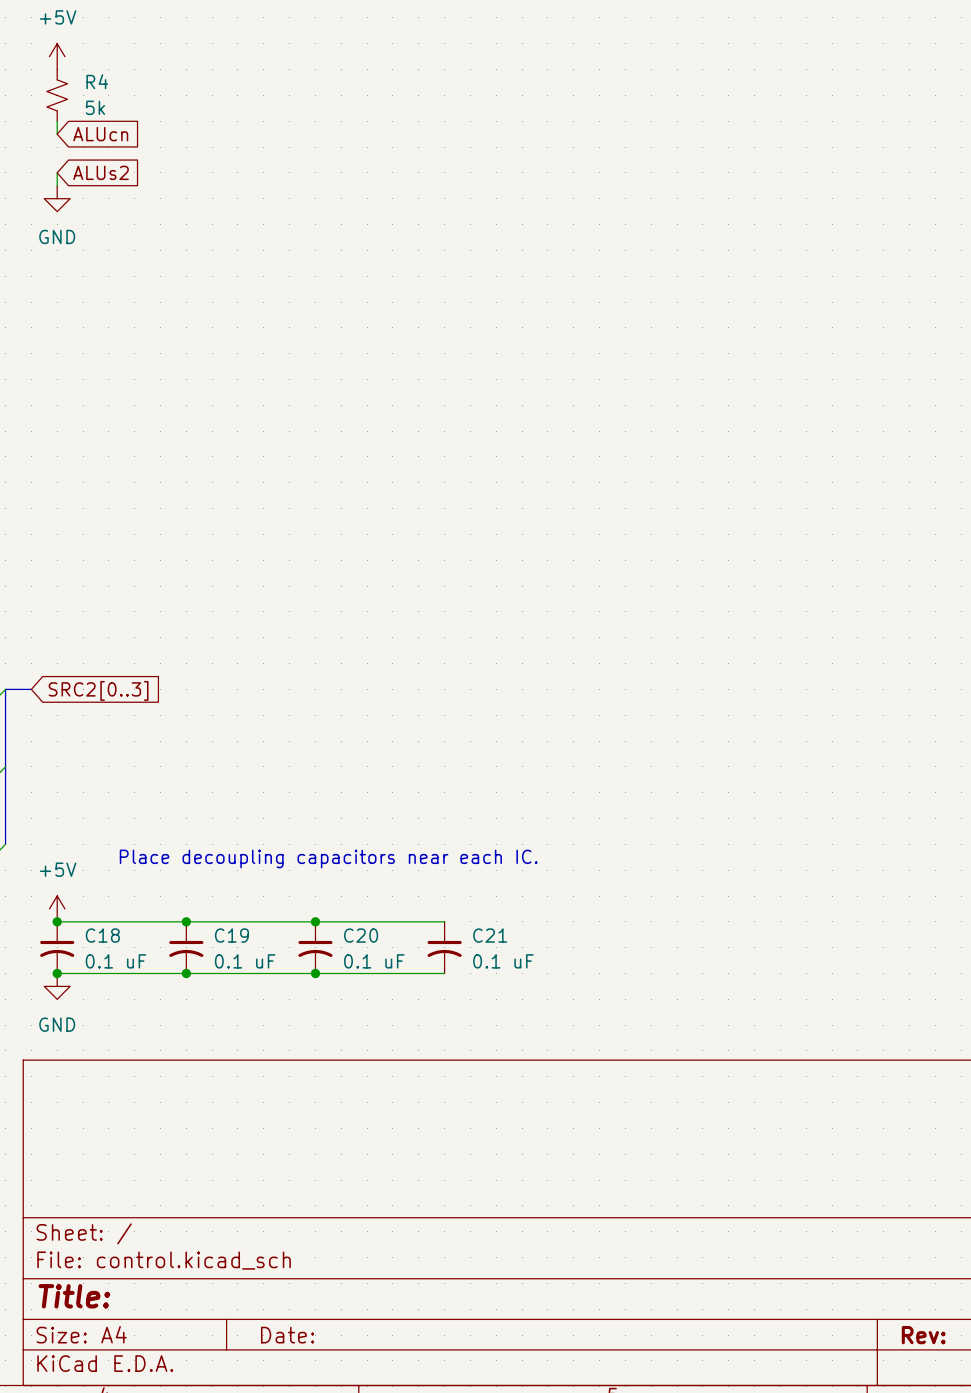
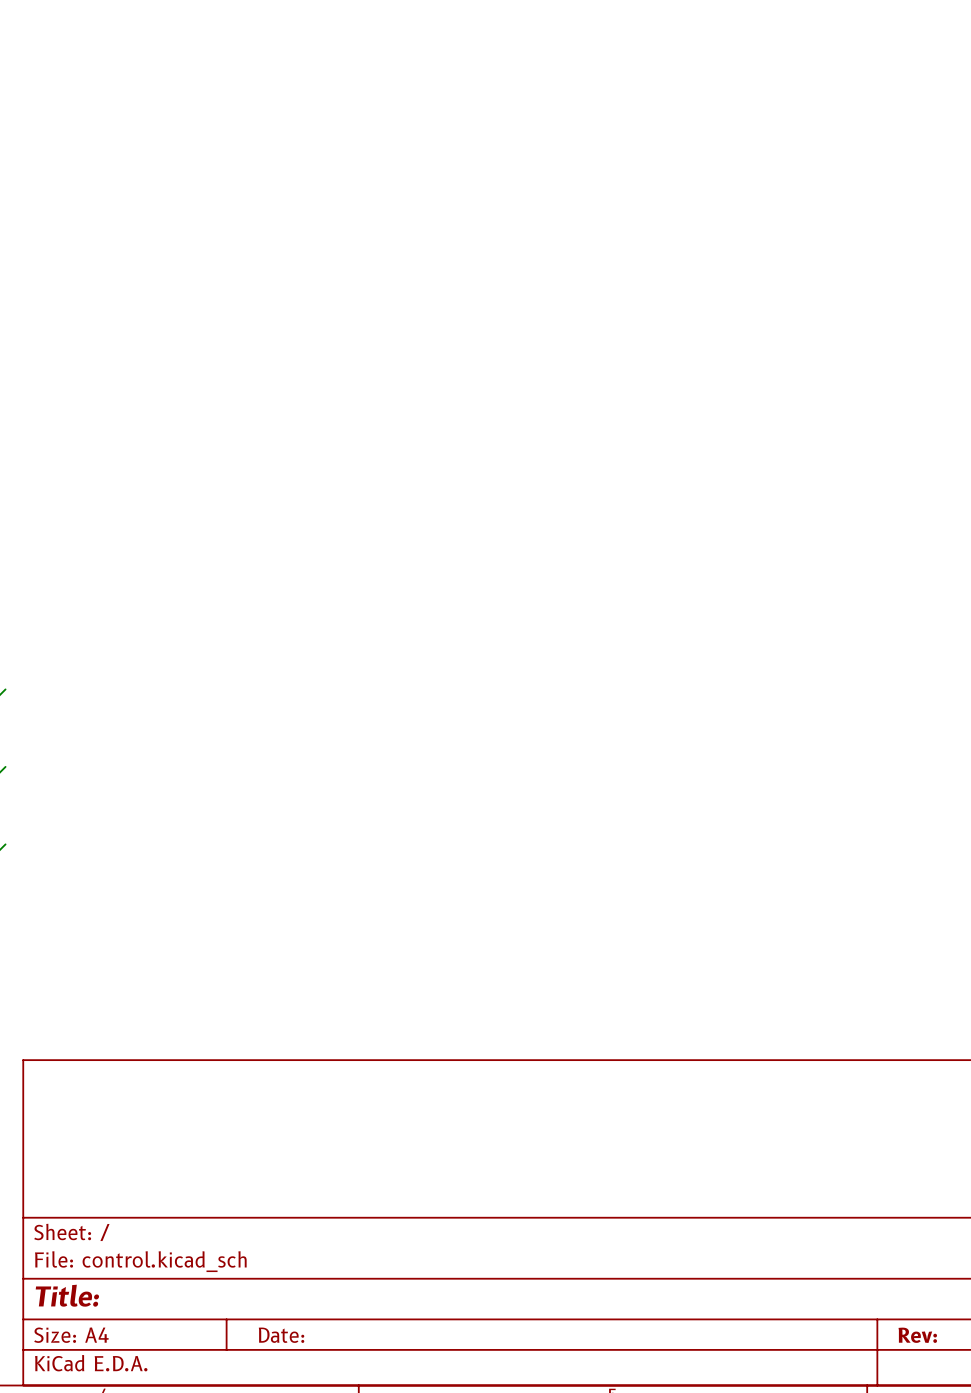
power symbol: +5V (57, 56) -> none
R4: 5k (57, 95) -> none
wire: (57, 121) (57, 134) -> none
global label: ALUcn (100, 134) -> none
wire: (57, 172) (57, 185) -> none
global label: ALUs2 (101, 172) -> none
power symbol: GND (57, 198) -> none
bus: (31, 689) (5, 689) (5, 844) -> none
global label: SRC2[0..3] (98, 690) -> none
text: Place decoupling capacitors near each IC. (328, 858) -> none
power symbol: +5V (57, 908) -> none
wire: (57, 921) (444, 921) -> none
junction: (57, 921) -> none
junction: (186, 921) -> none
junction: (315, 921) -> none
C18: 0.1 uF (57, 947) -> none
C19: 0.1 uF (186, 947) -> none
C20: 0.1 uF (315, 947) -> none
C21: 0.1 uF (444, 947) -> none
wire: (57, 973) (444, 973) -> none
junction: (57, 973) -> none
junction: (186, 973) -> none
junction: (315, 973) -> none
power symbol: GND (57, 986) -> none

